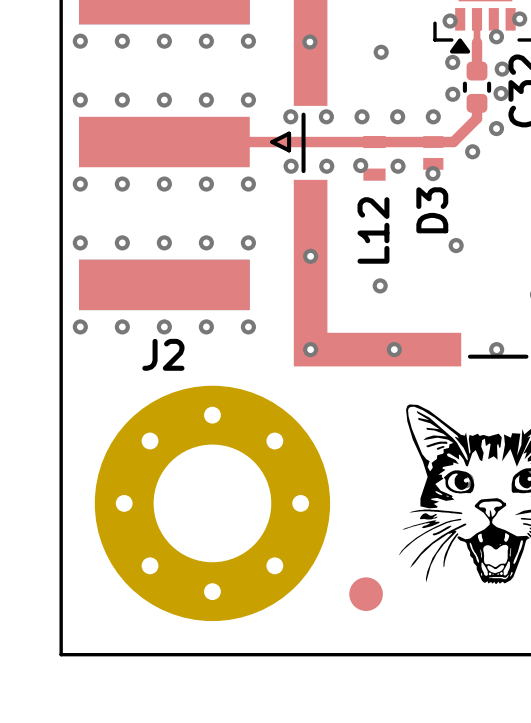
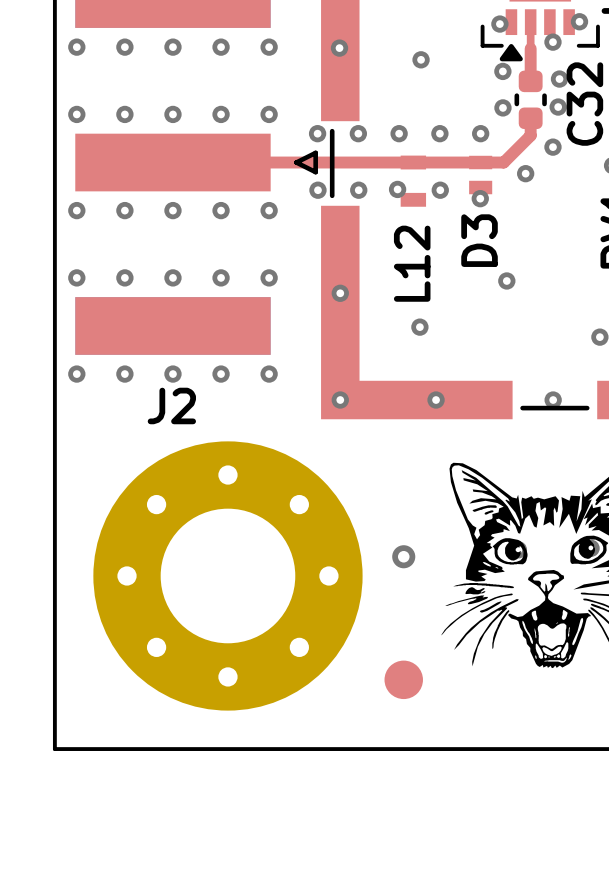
via: none -> (403, 556)

